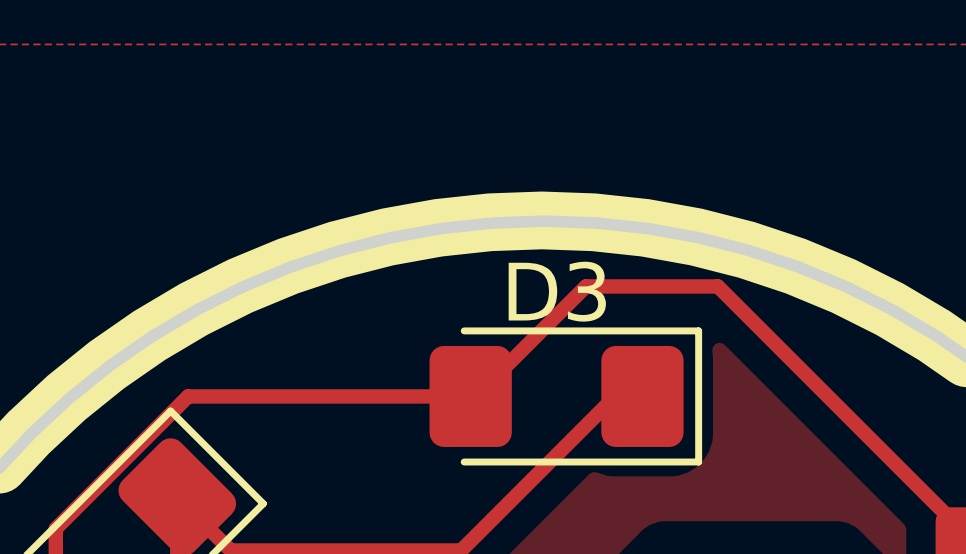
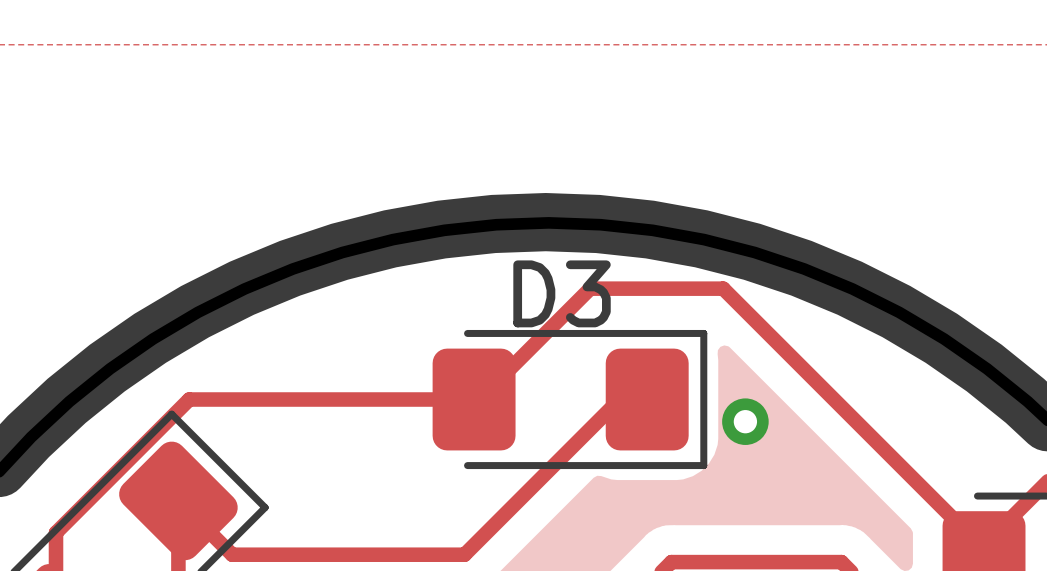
via: none -> (745, 421)

